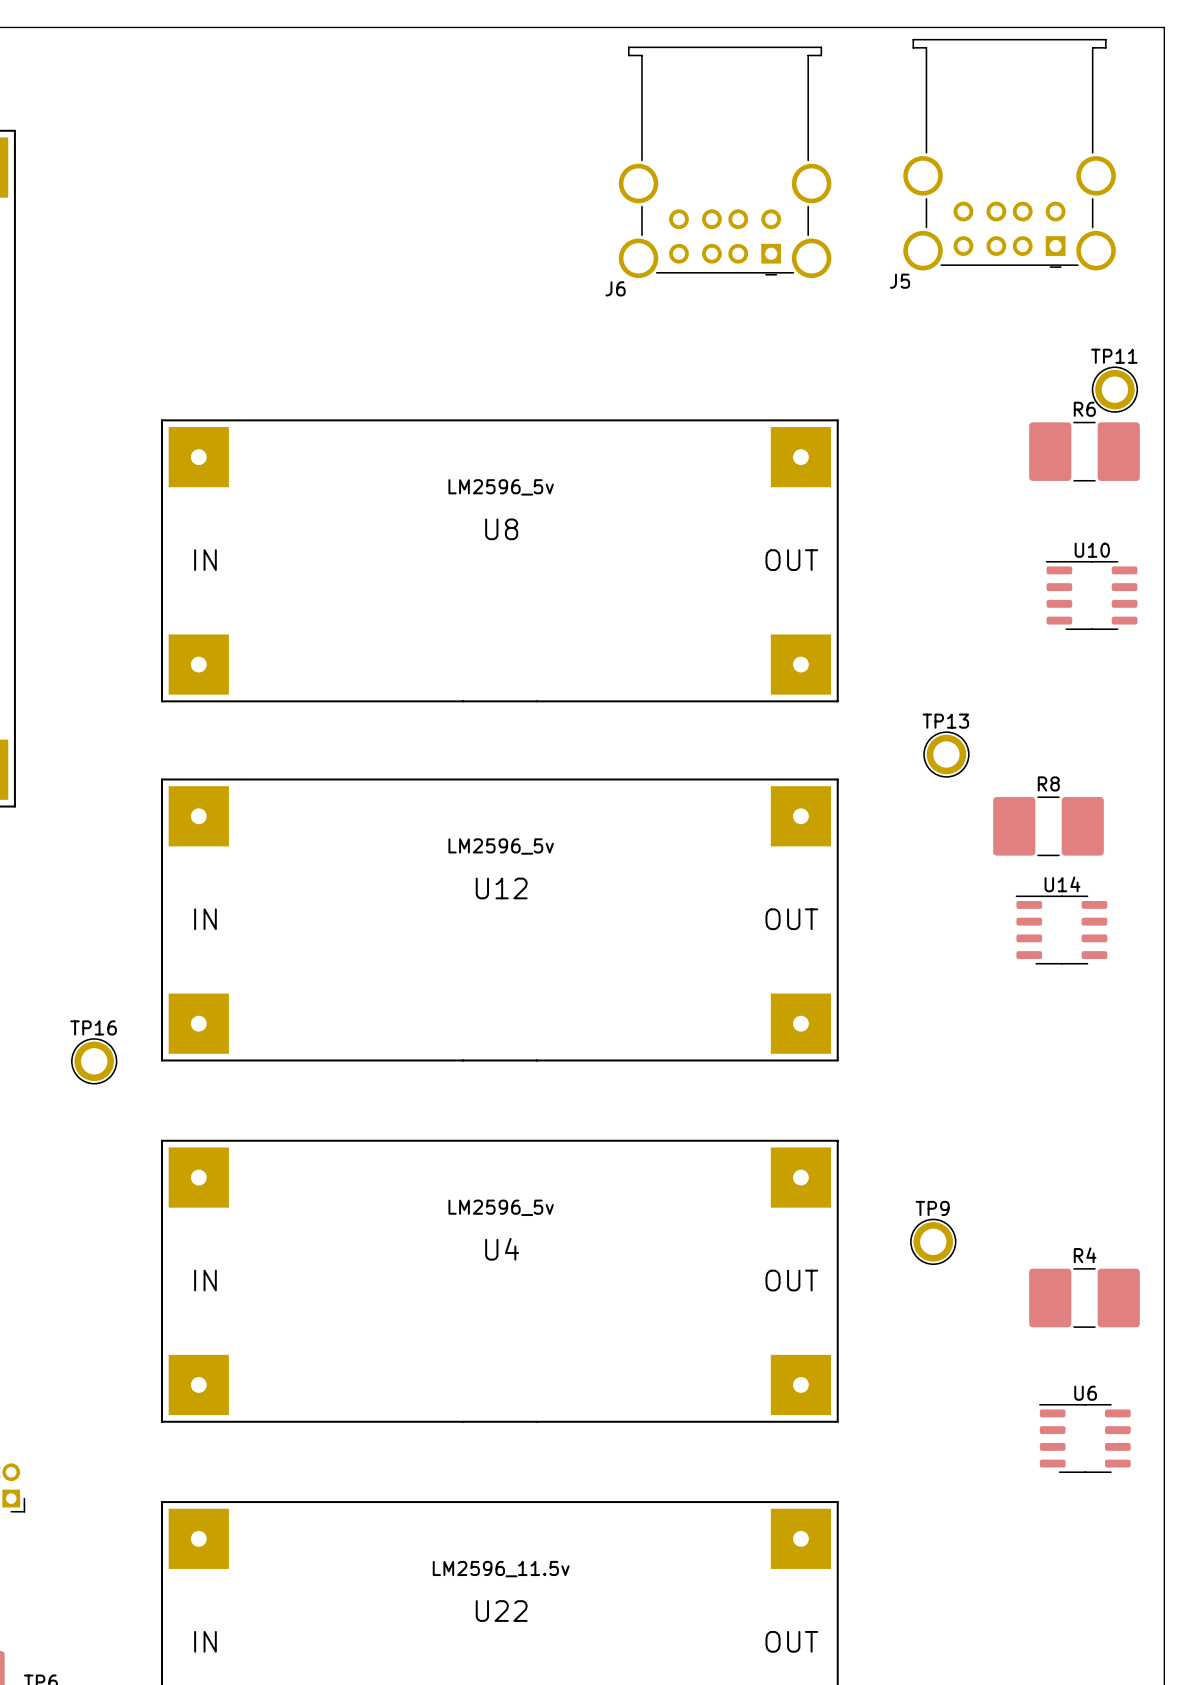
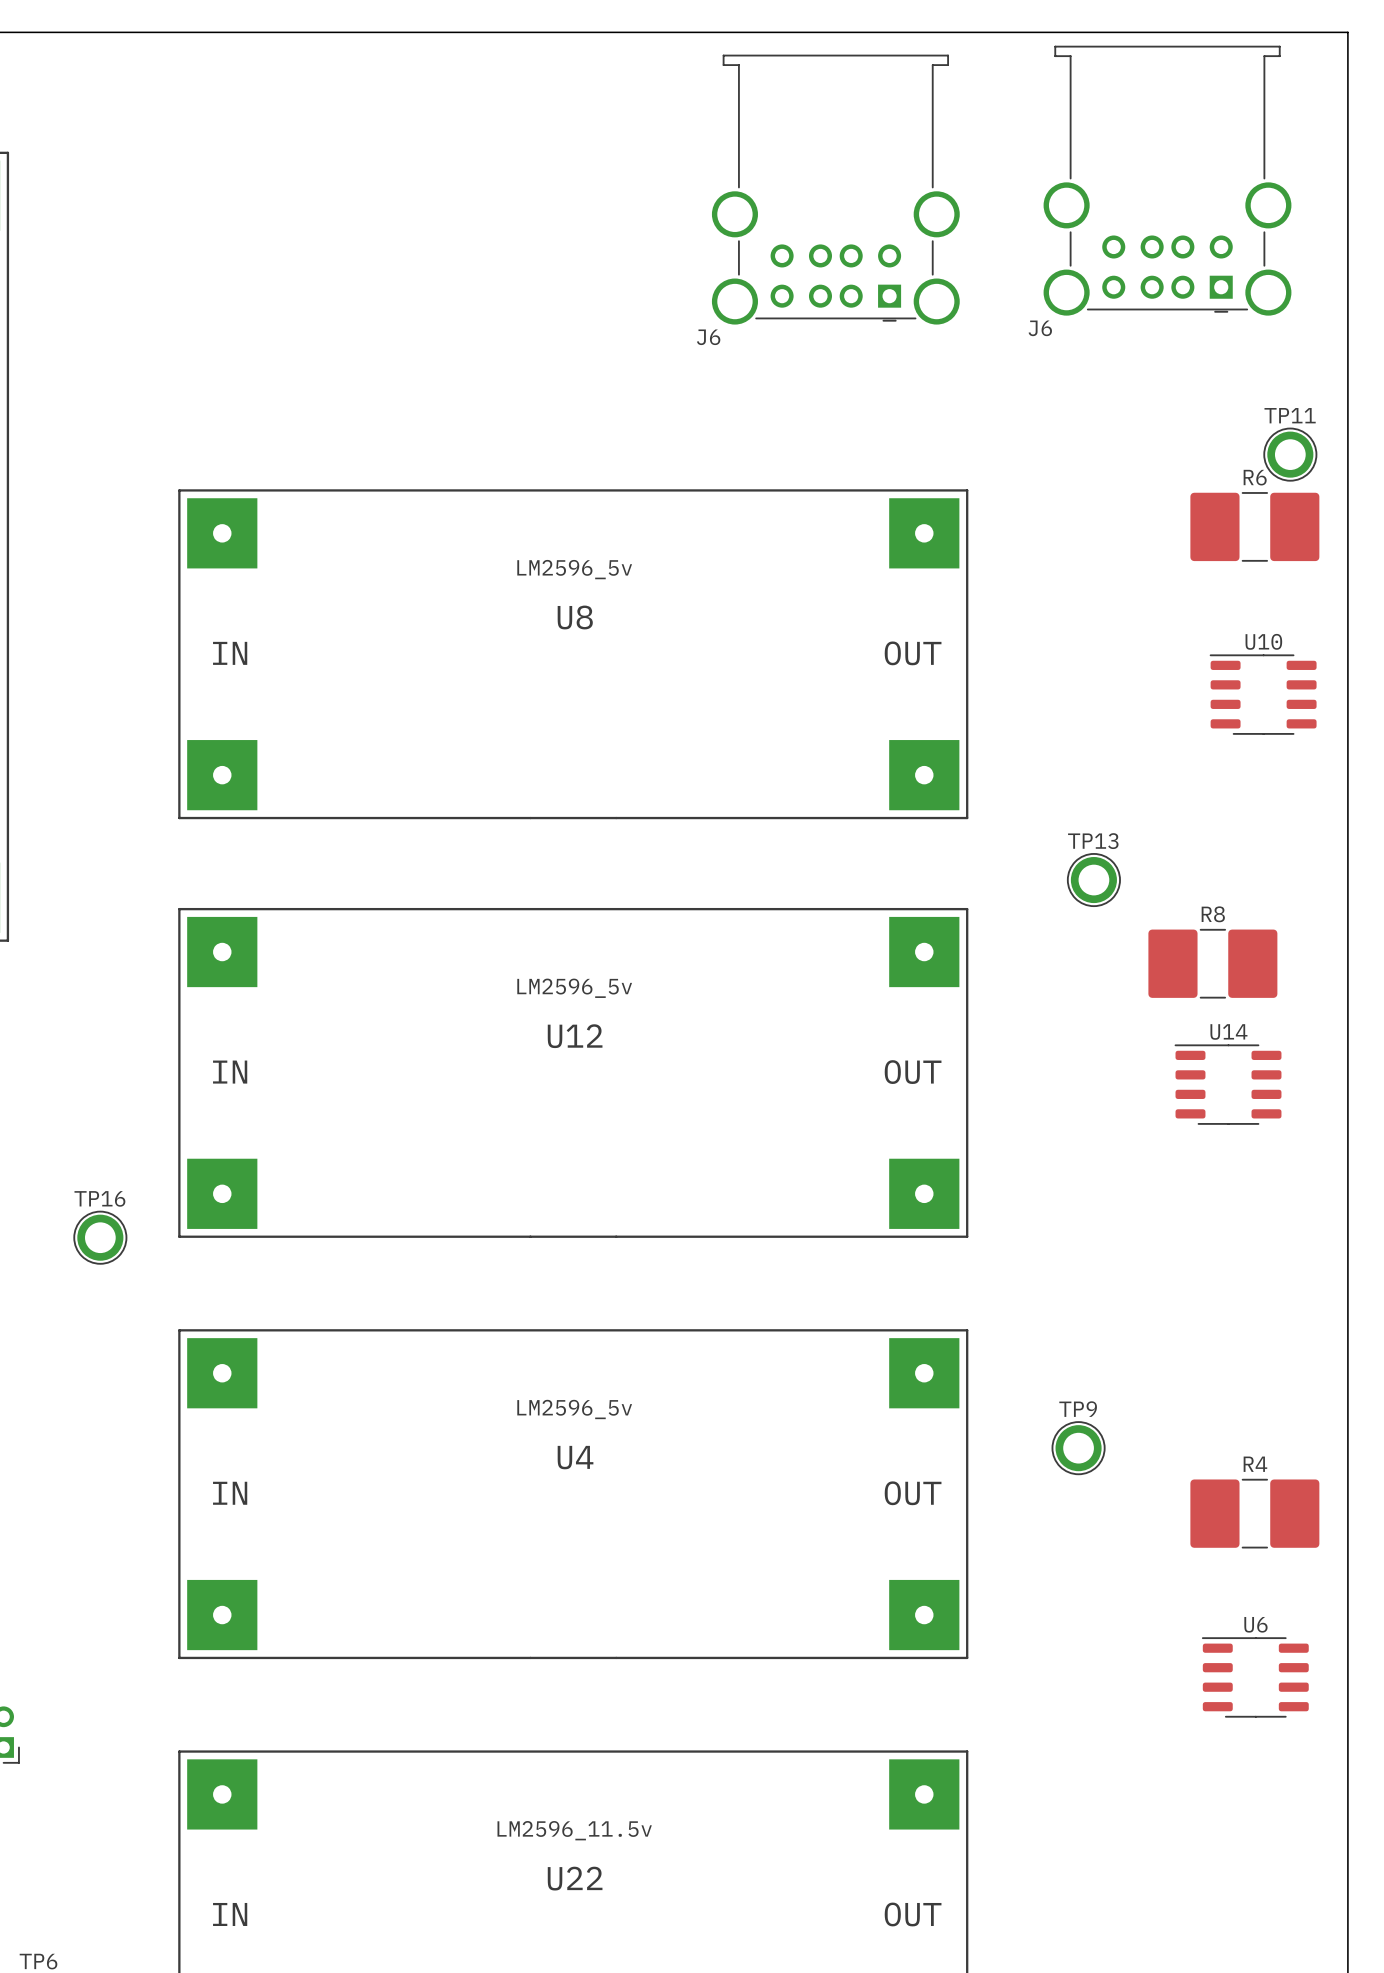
J5 name: J5 (900, 281) -> J6 (1040, 328)

